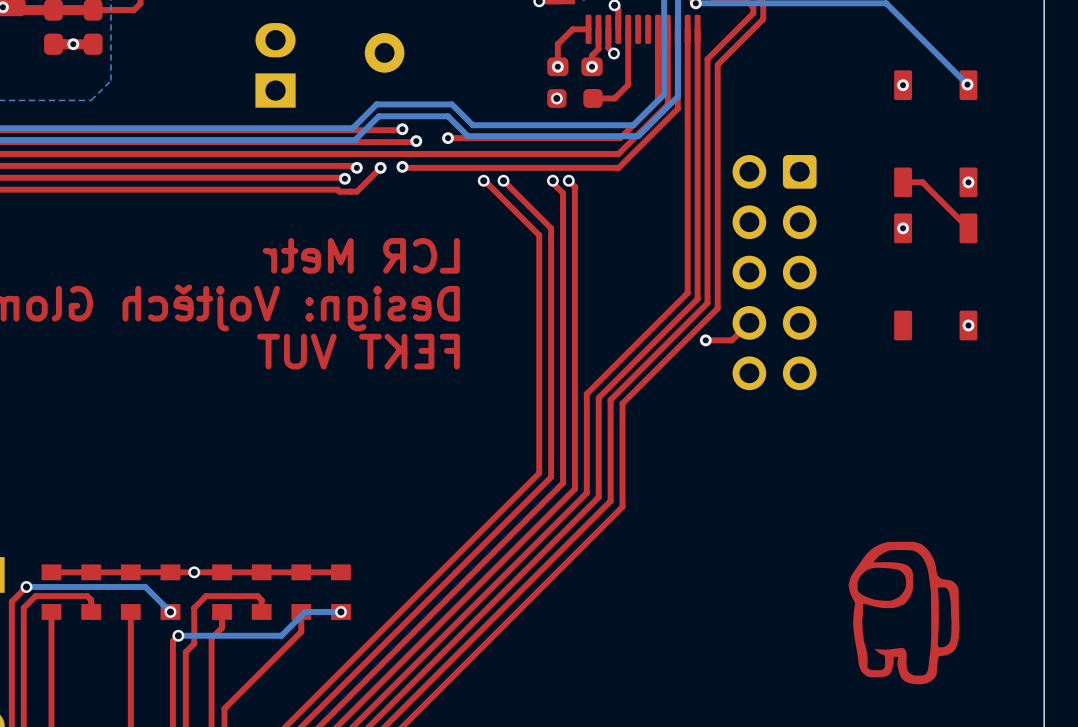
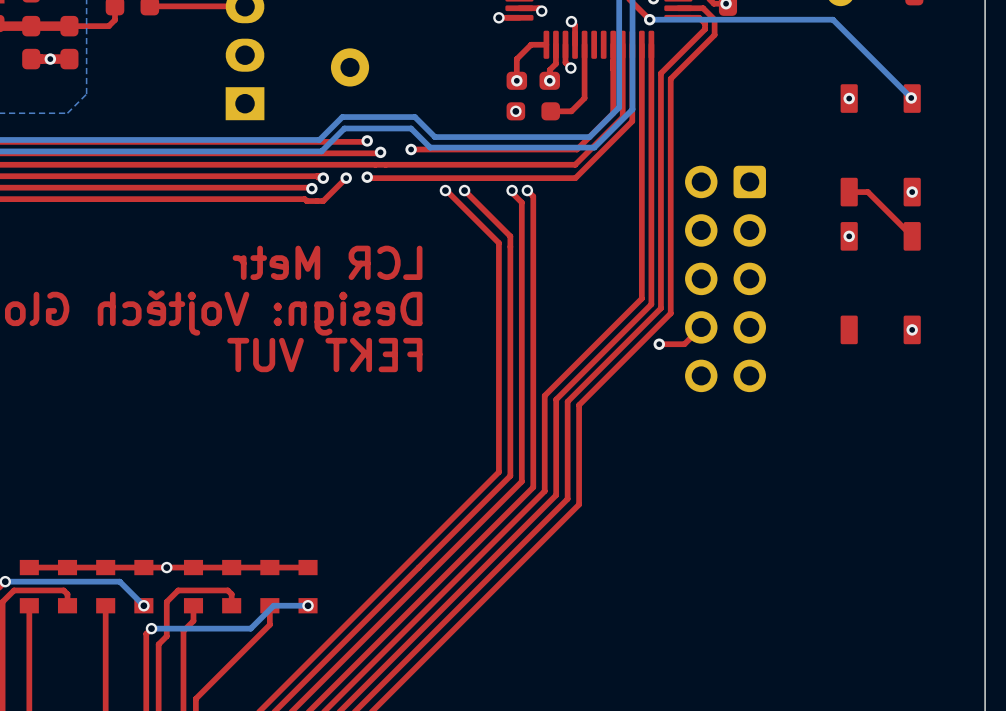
drawing: [848, 541, 960, 685] -> none

